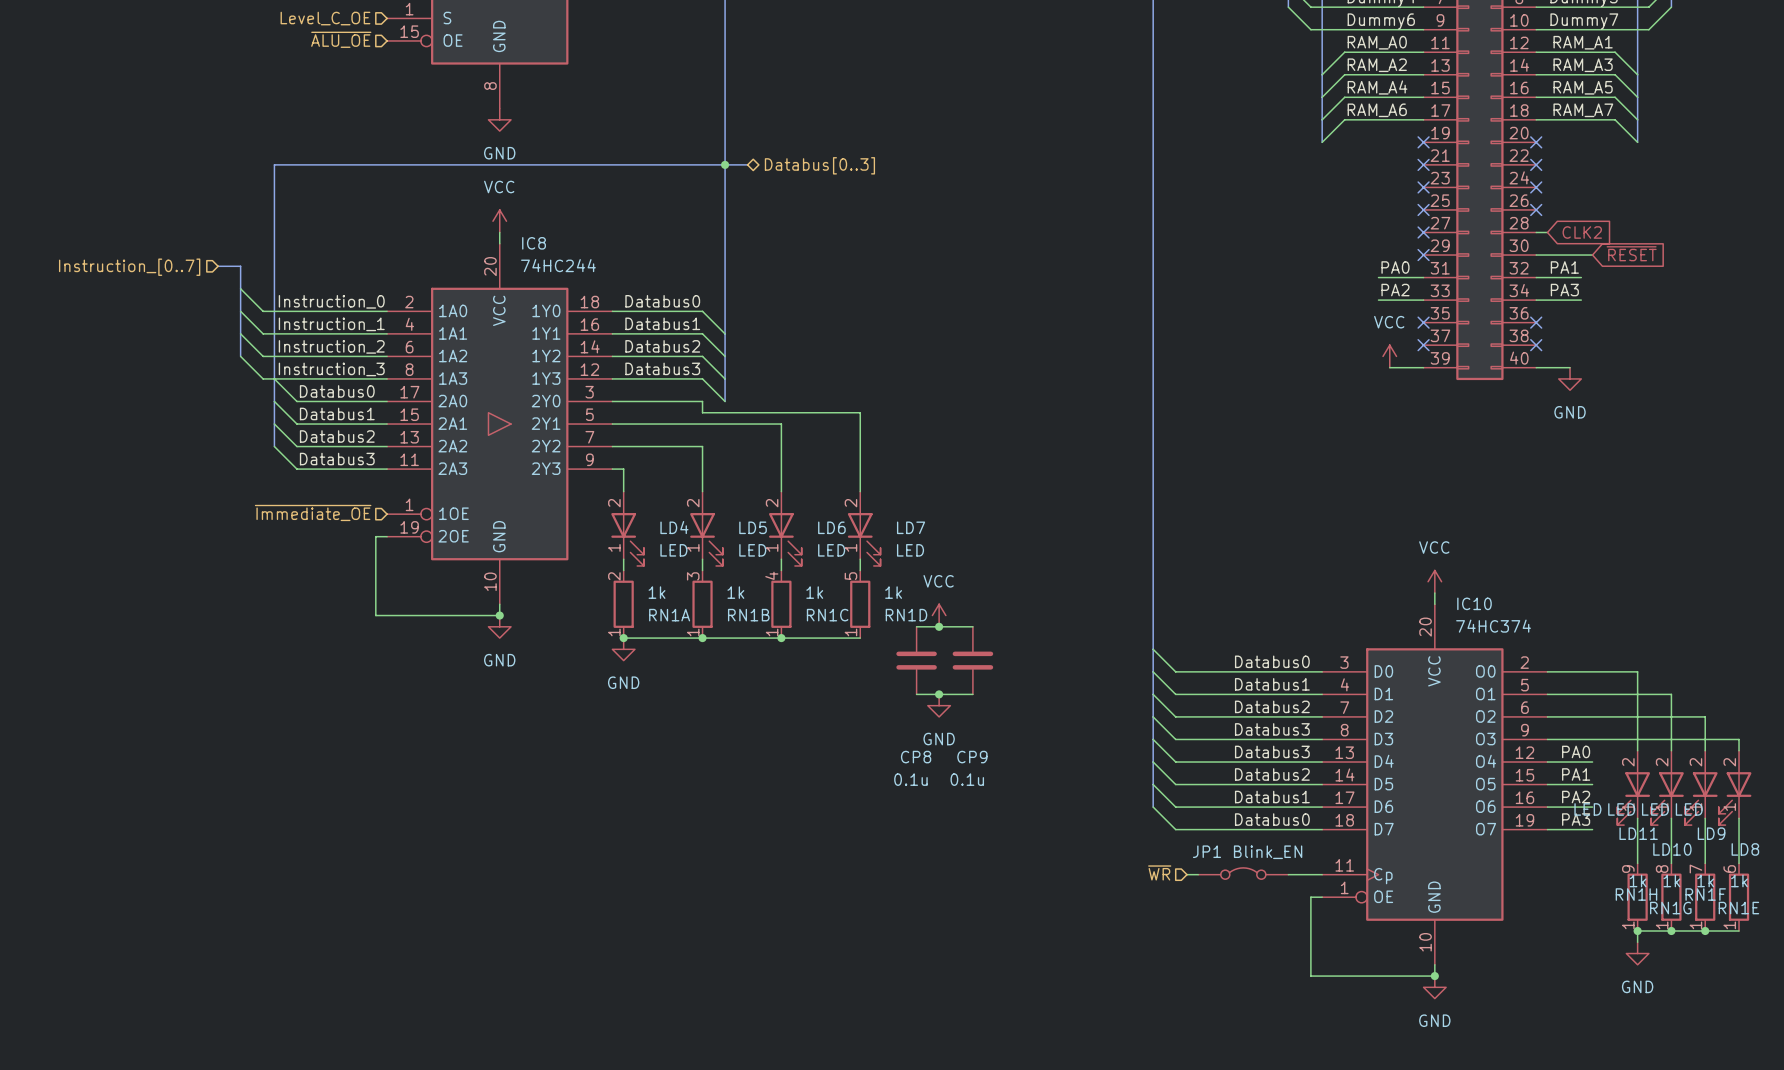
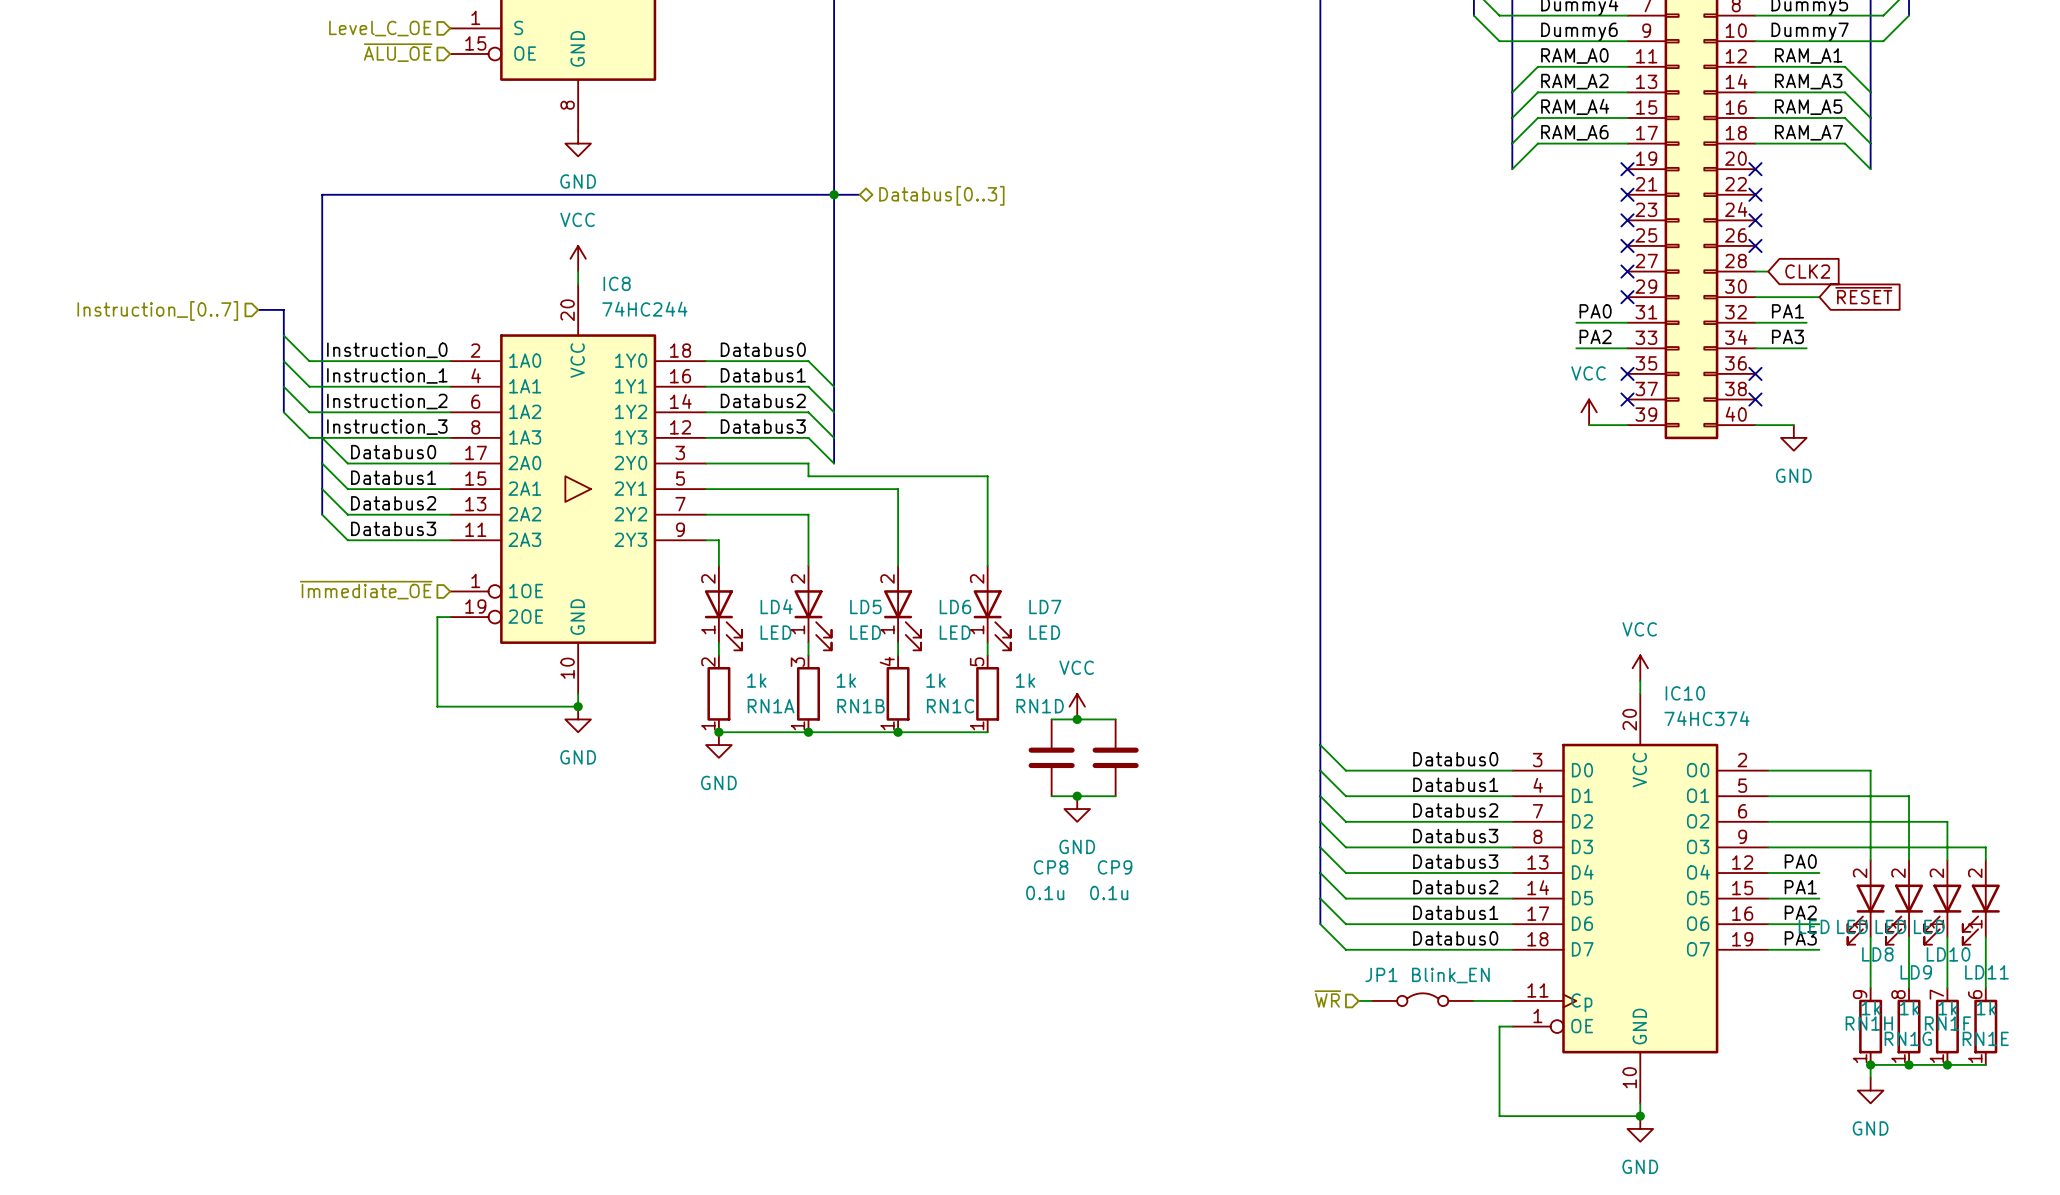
LD11 name: LD11 (1638, 833) -> LD8 (1877, 954)
LD9 name: LD9 (1711, 833) -> LD10 (1948, 954)
LD10 name: LD10 (1672, 849) -> LD9 (1916, 972)
LD8 name: LD8 (1745, 849) -> LD11 (1986, 972)

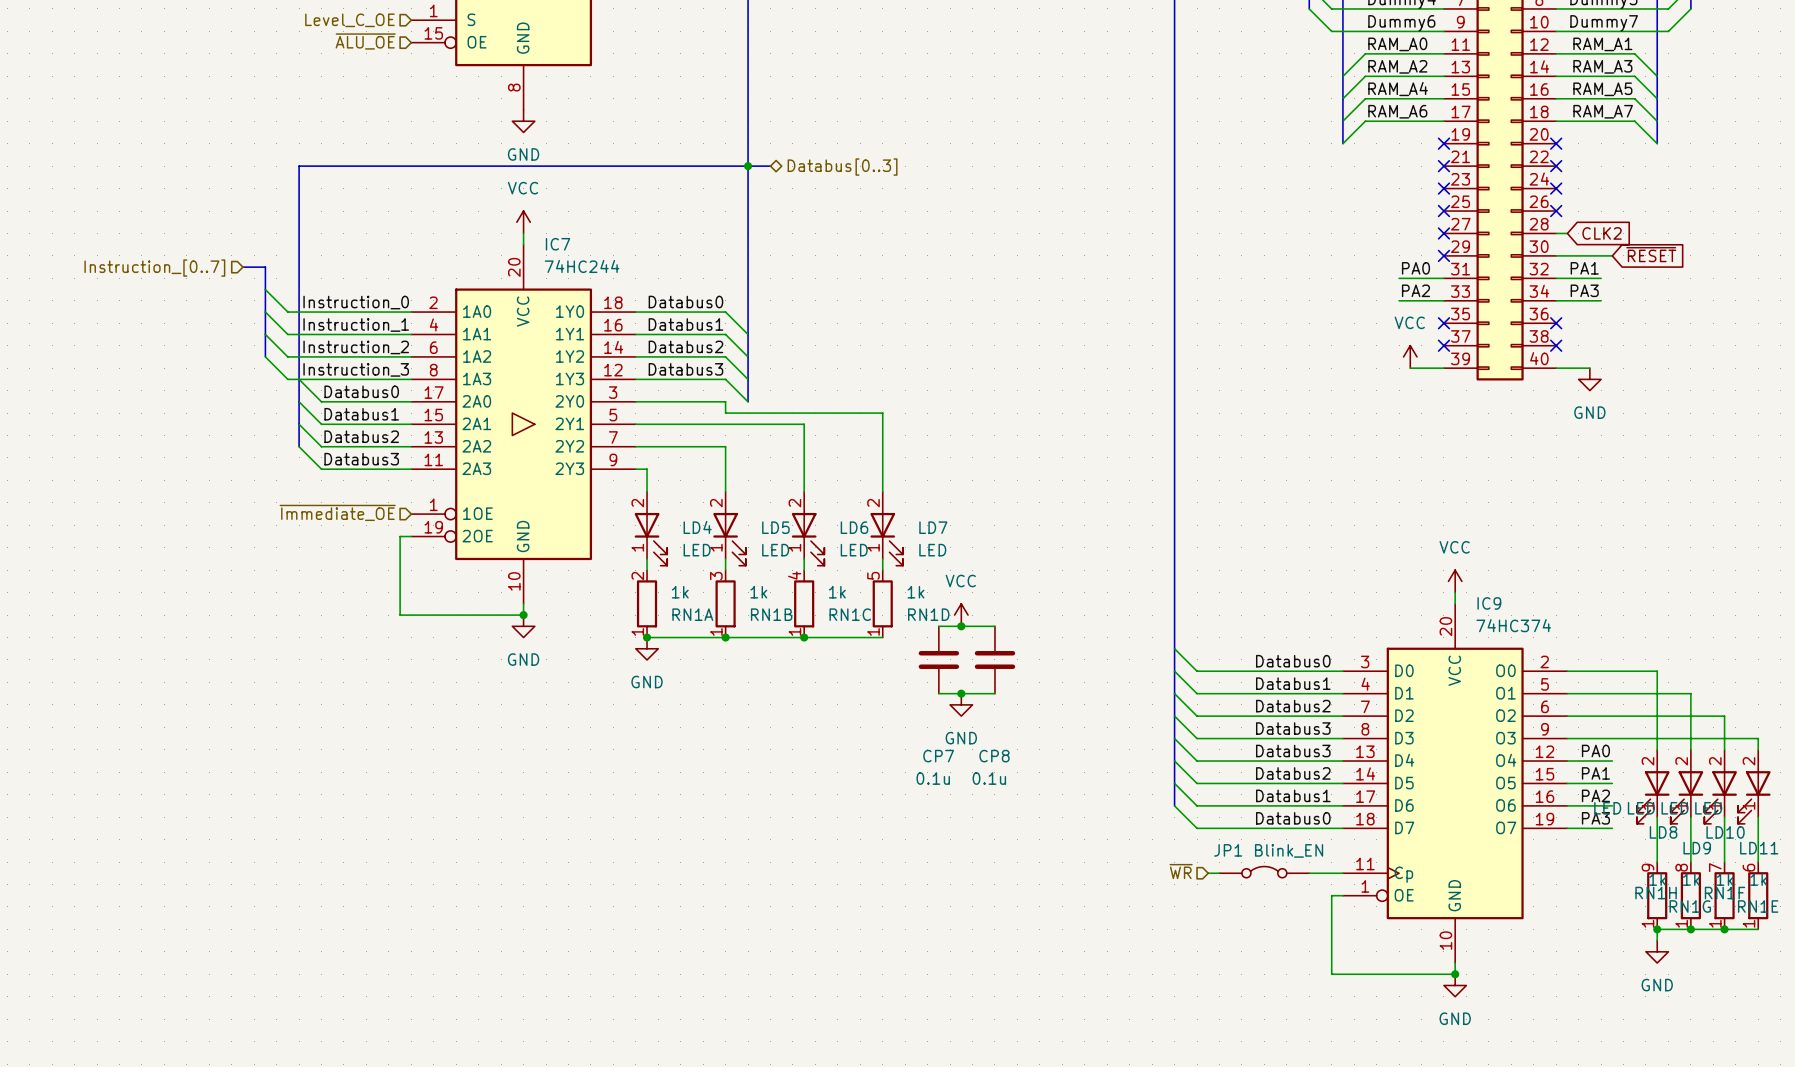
IC8 name: IC8 (617, 283) -> IC7 (558, 244)
IC10 name: IC10 (1685, 693) -> IC9 (1489, 603)
CP8 name: CP8 (1051, 867) -> CP7 (938, 756)
CP9 name: CP9 (1115, 867) -> CP8 (994, 756)

